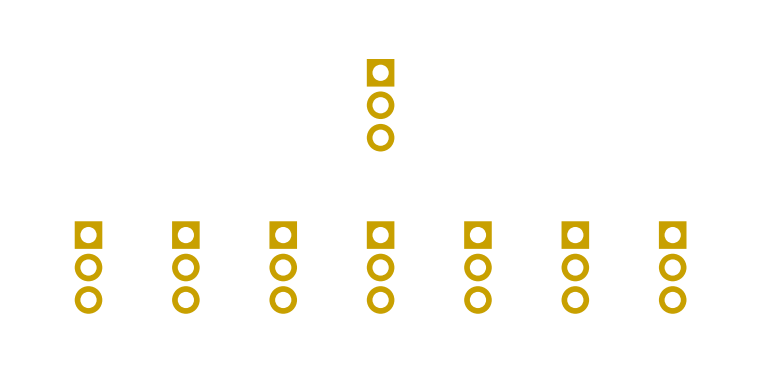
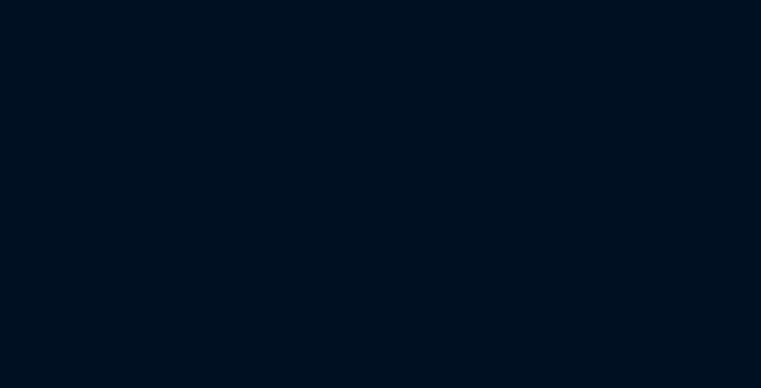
part: (380, 105) -> none
part: (88, 267) -> none
part: (185, 267) -> none
part: (283, 267) -> none
part: (380, 267) -> none
part: (477, 267) -> none
part: (575, 267) -> none
part: (672, 267) -> none

